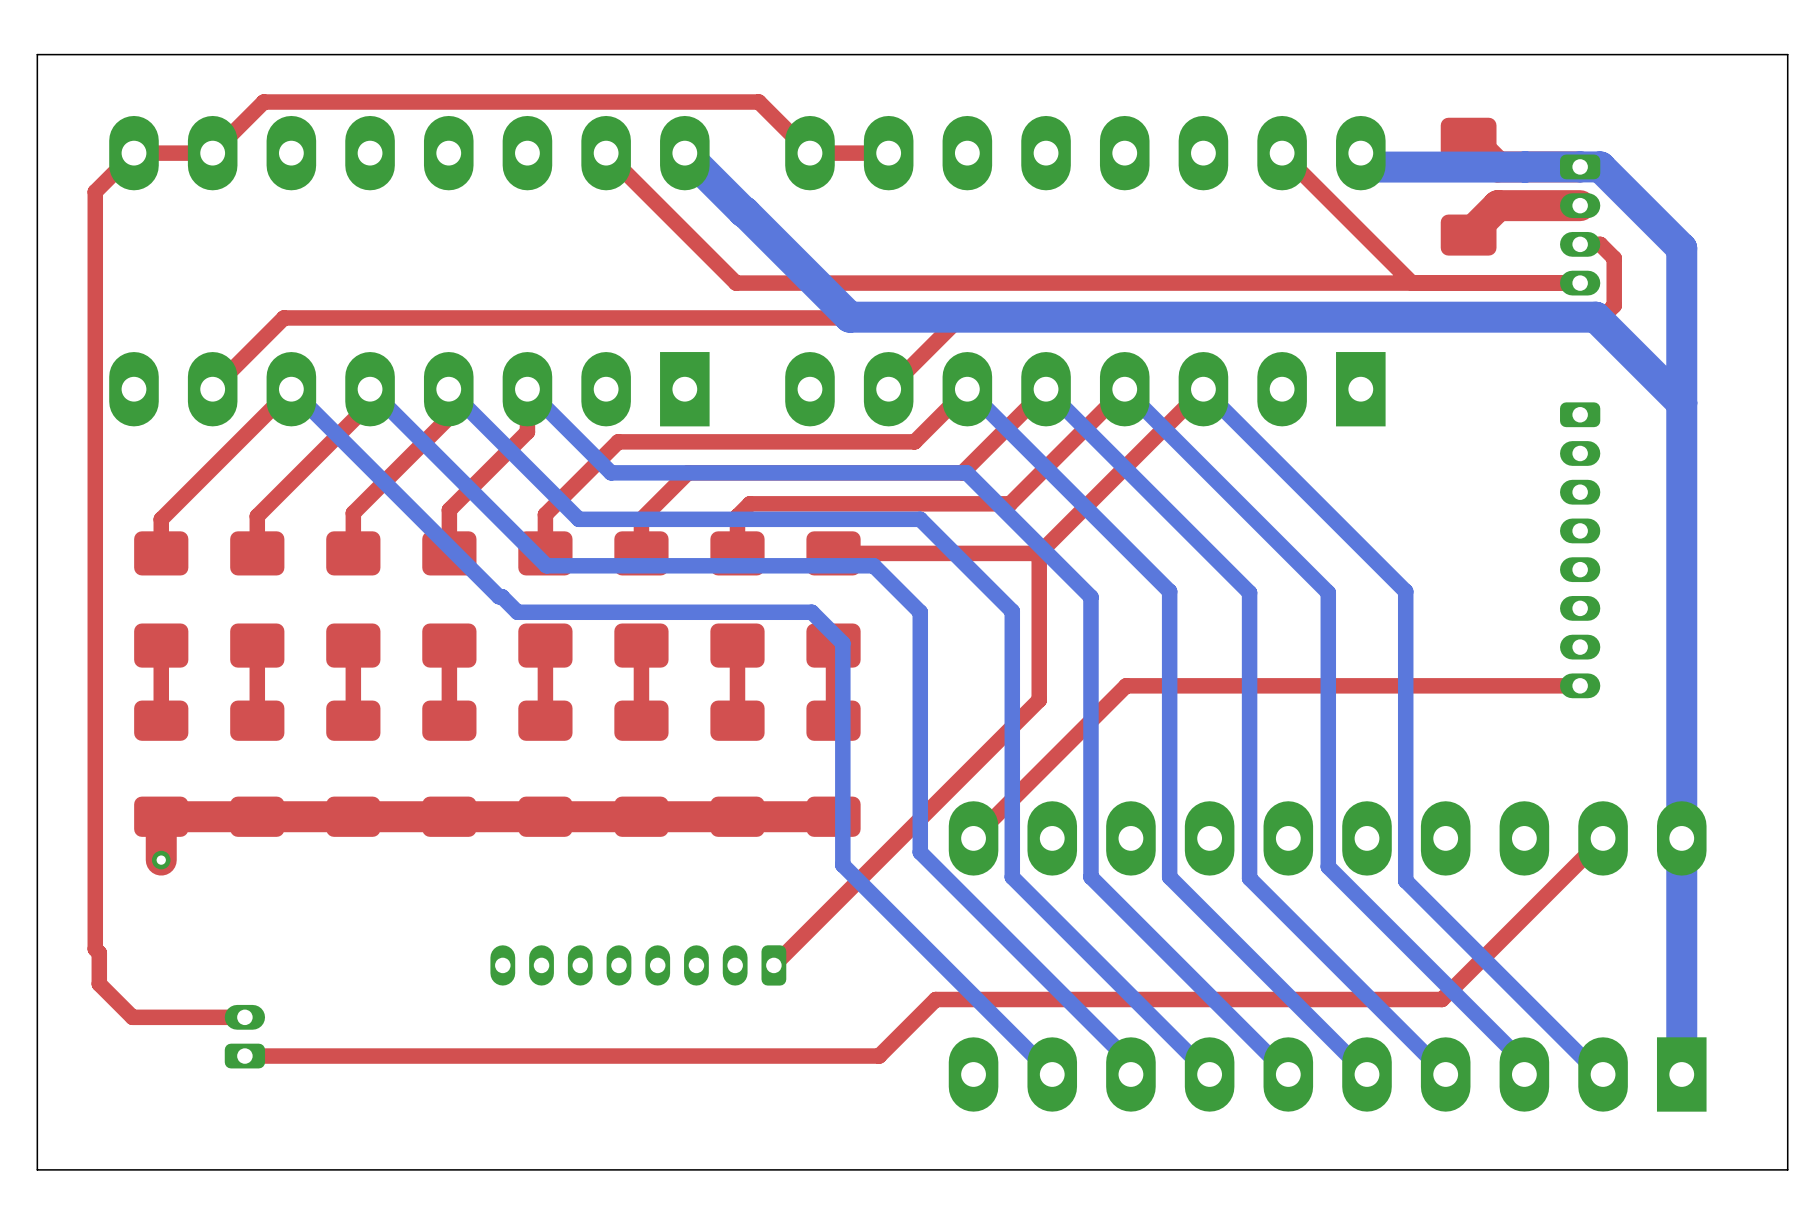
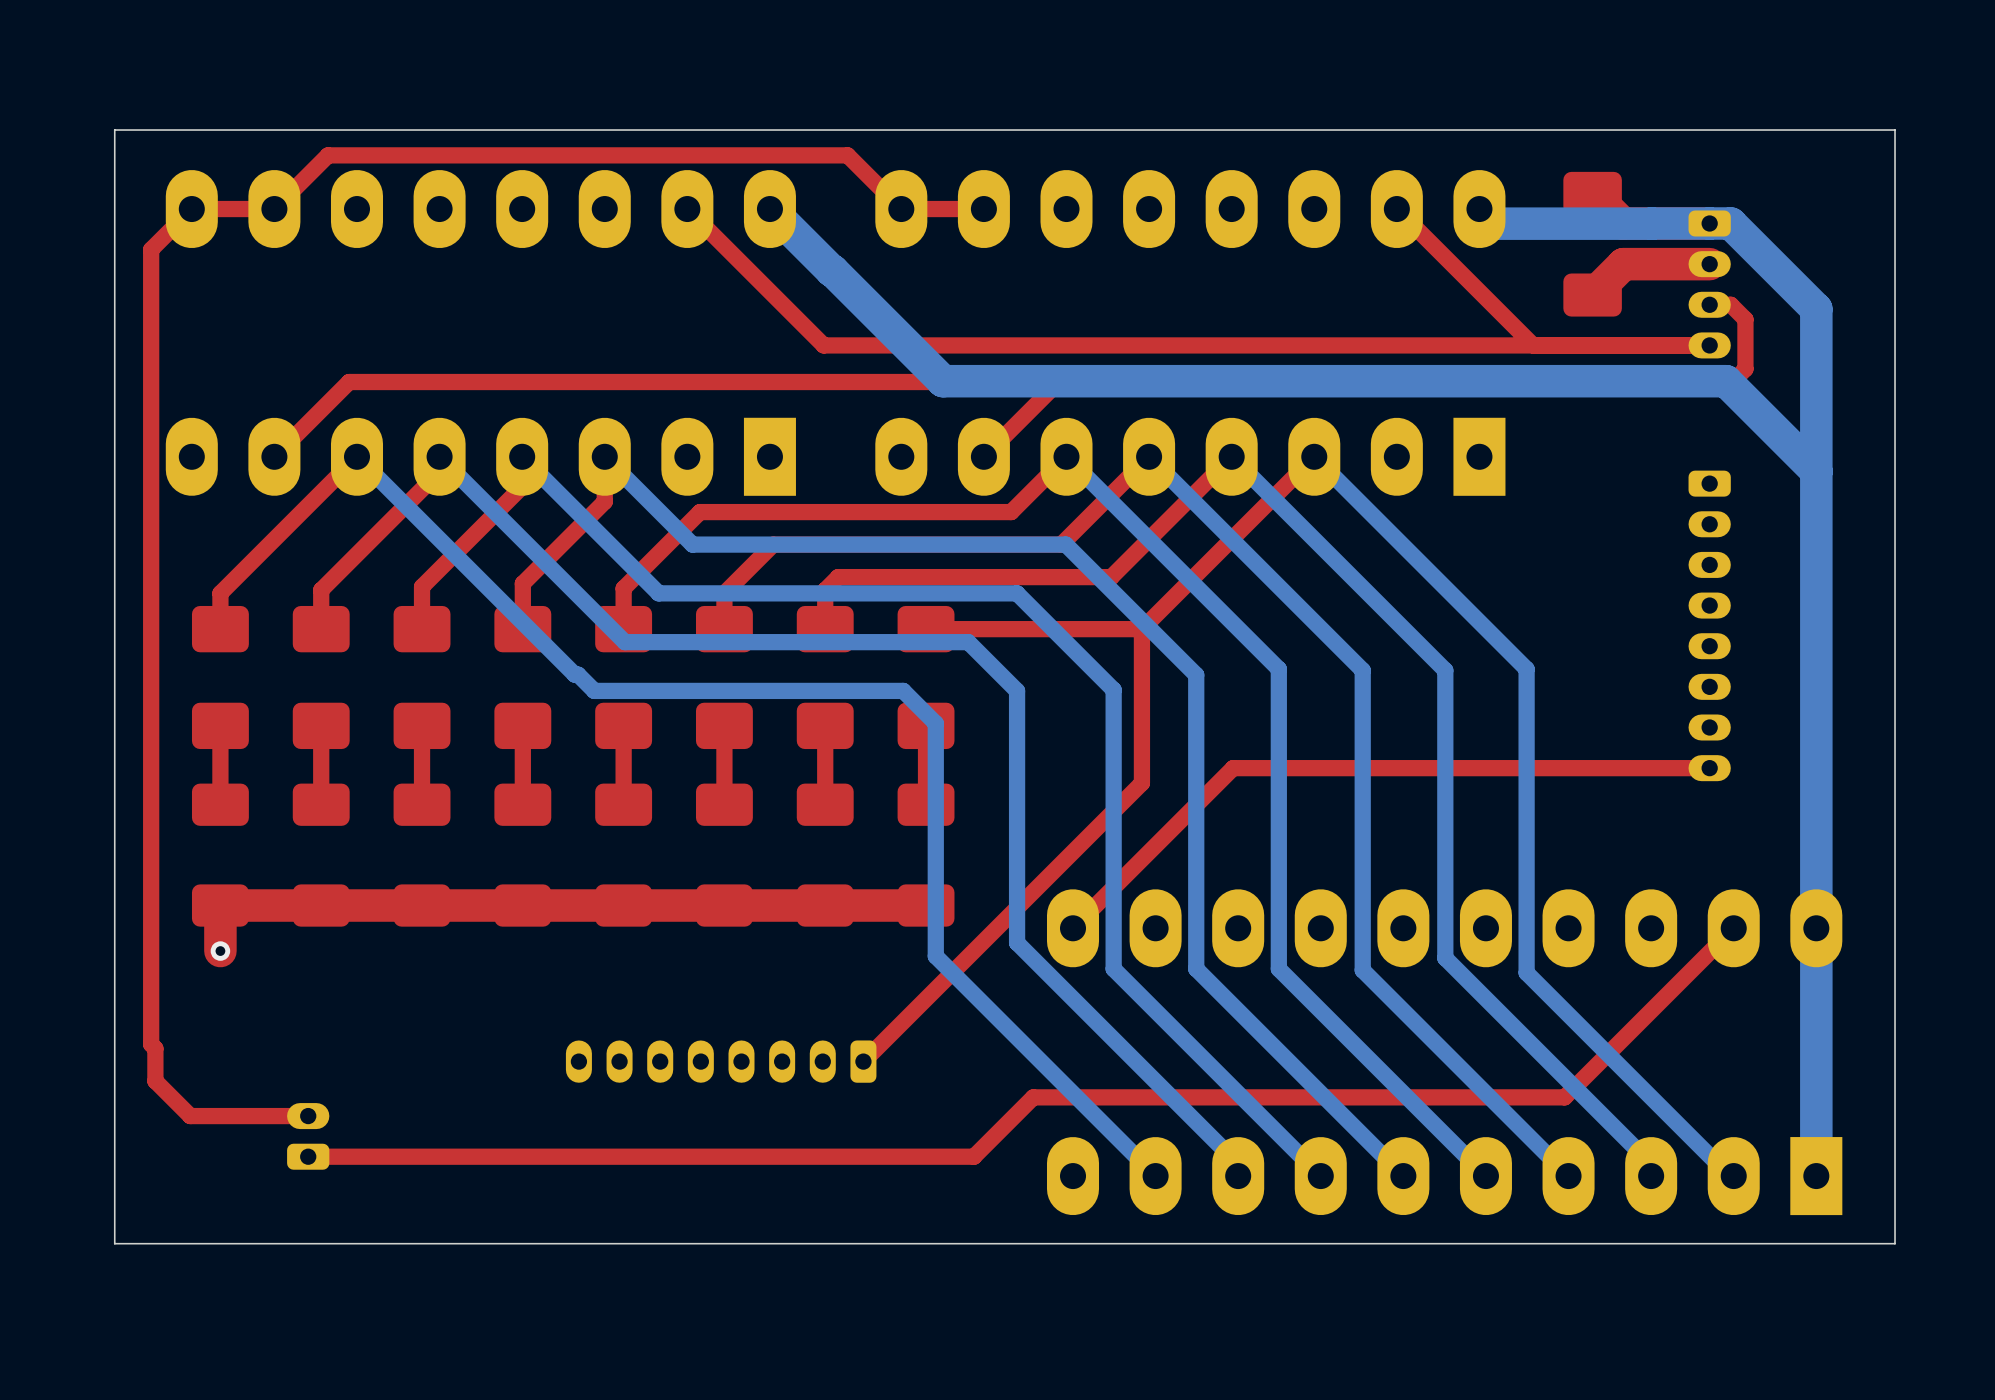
board edge: (1787, 54) (37, 54) (37, 1169) (1787, 1169) (1787, 54) -> (1895, 130) (1895, 1243) (114, 1243) (114, 130) (1895, 130)

